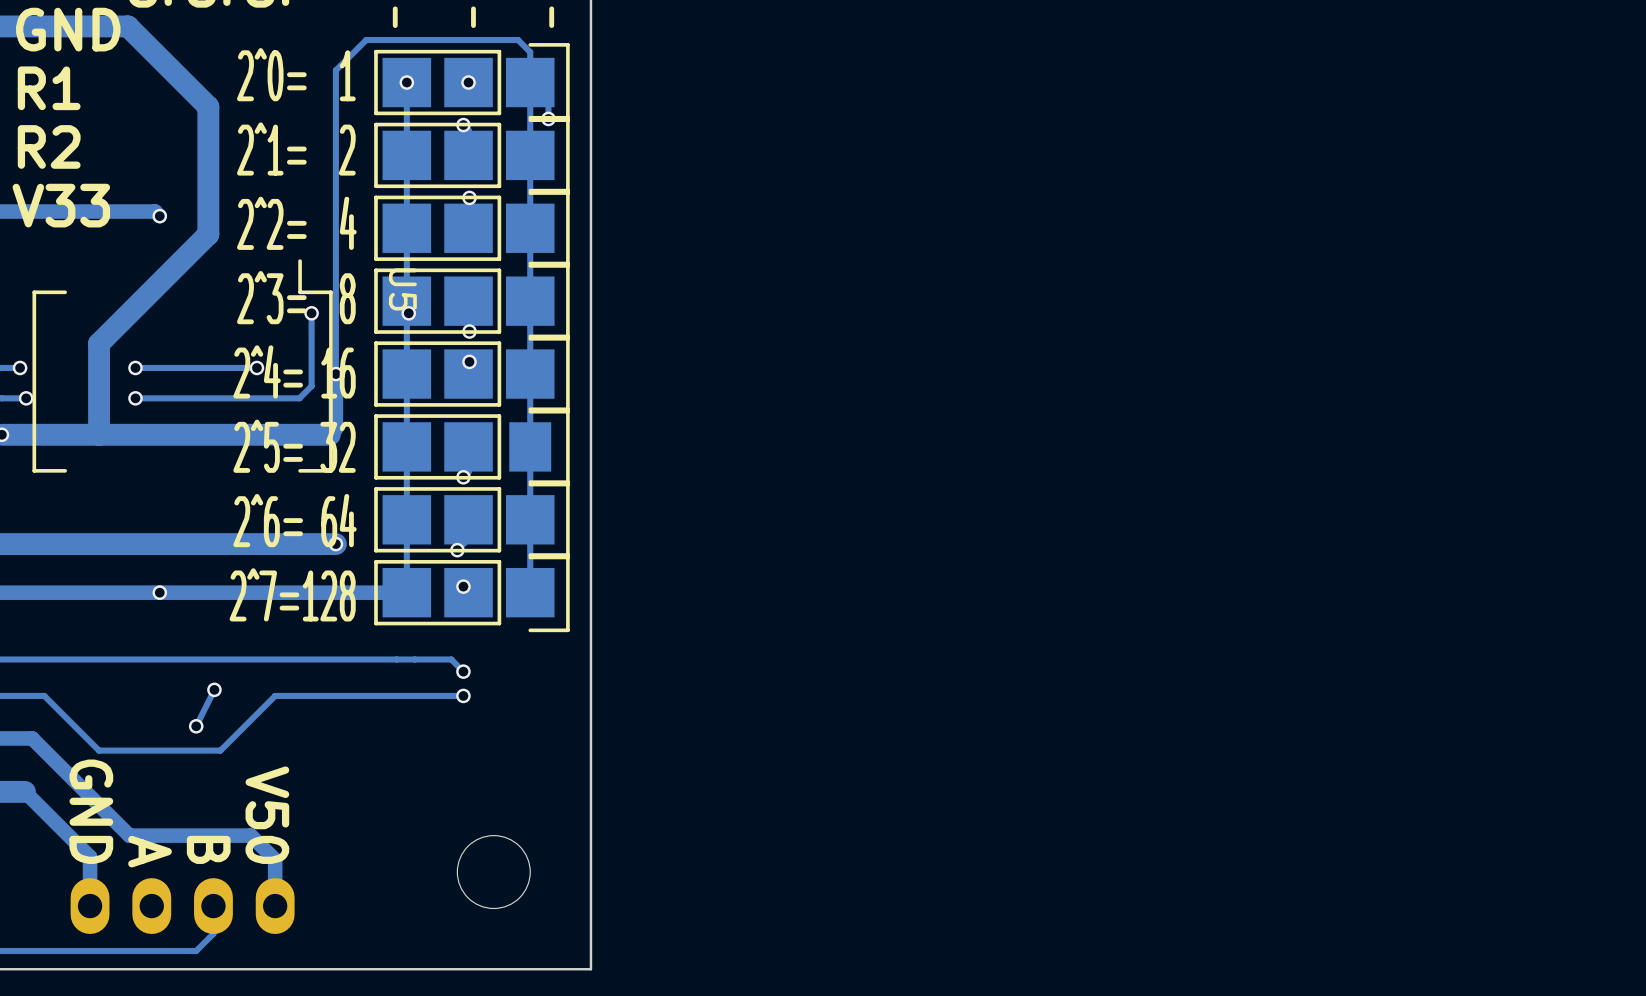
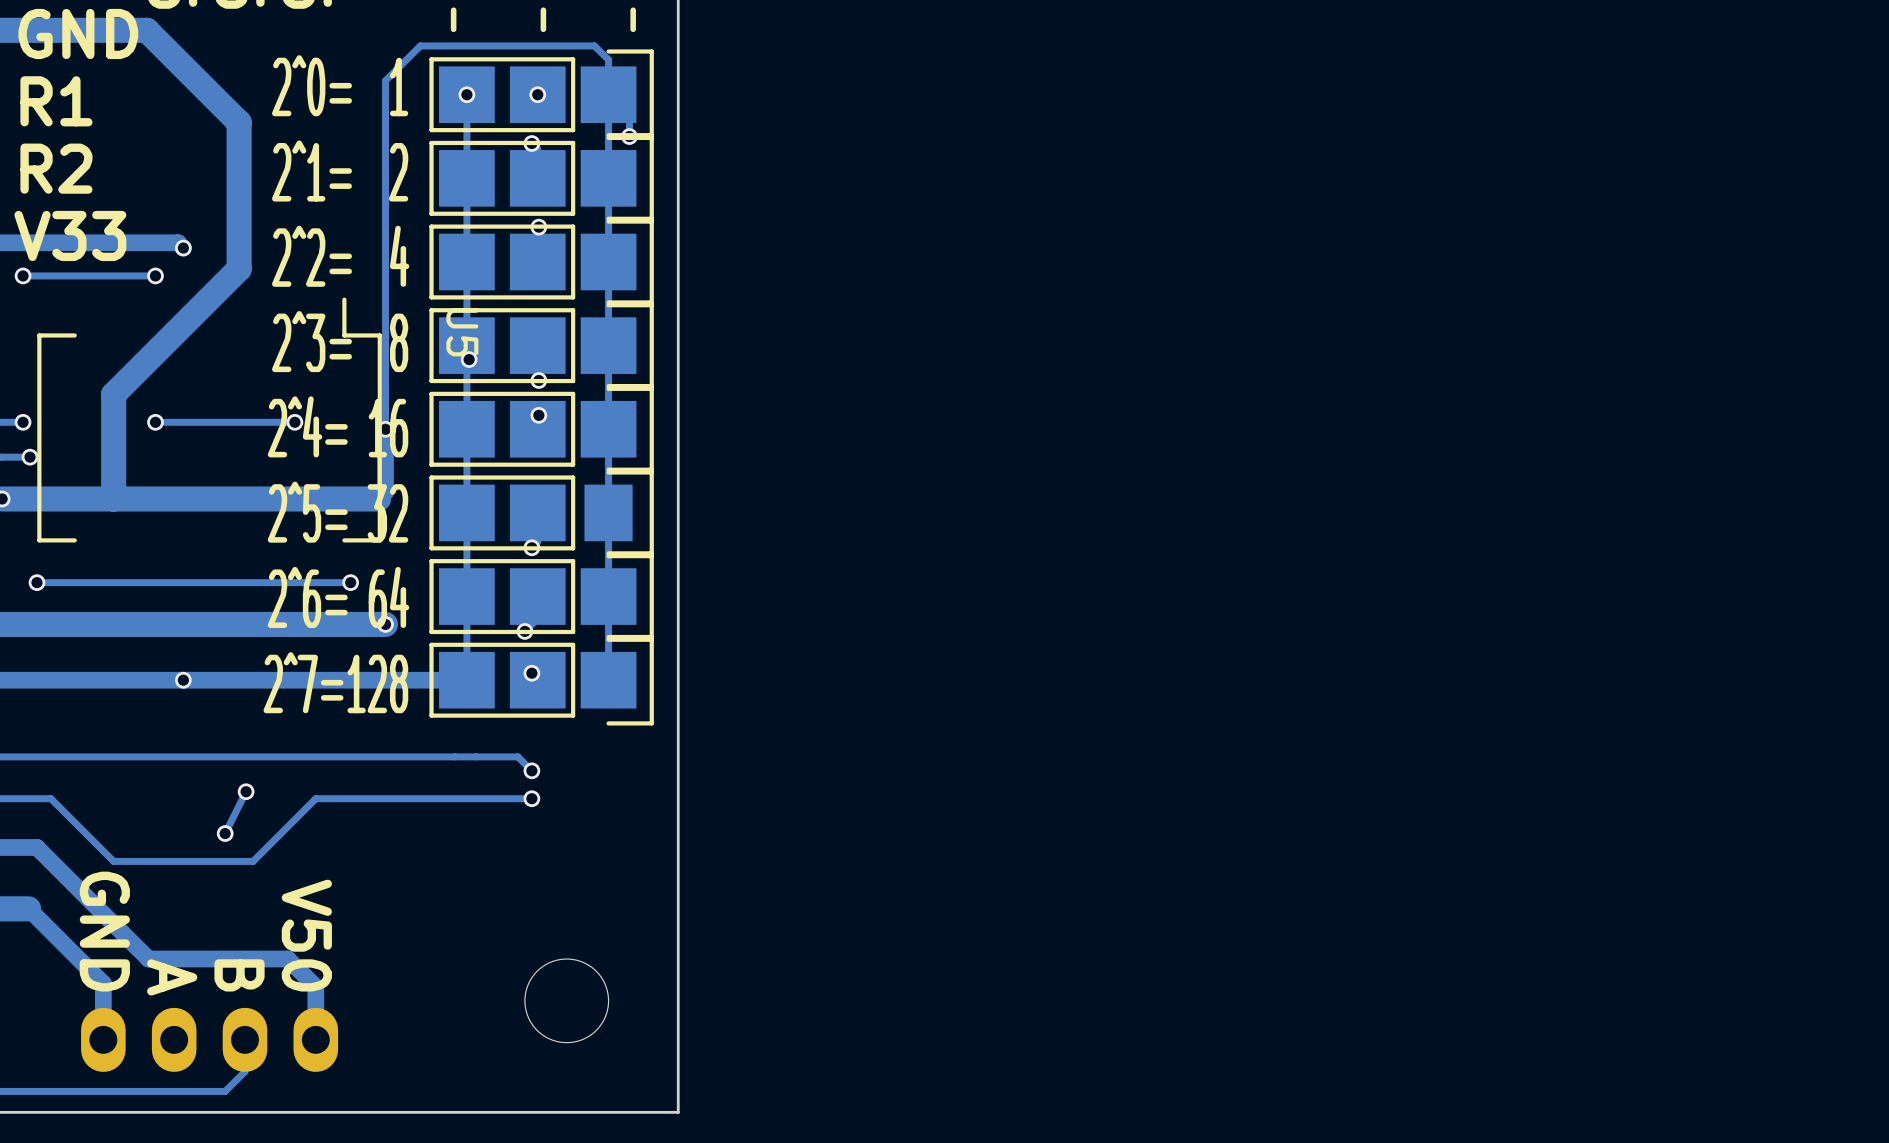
via: none -> (23, 275)
track: none -> (155, 275) (23, 275)
via: none -> (155, 275)
track: (311, 313) (311, 386) (299, 398) (135, 398) -> none
via: (311, 313) -> none
via: (135, 398) -> none
via: none -> (37, 582)
track: none -> (350, 582) (37, 582)
via: none -> (350, 582)

